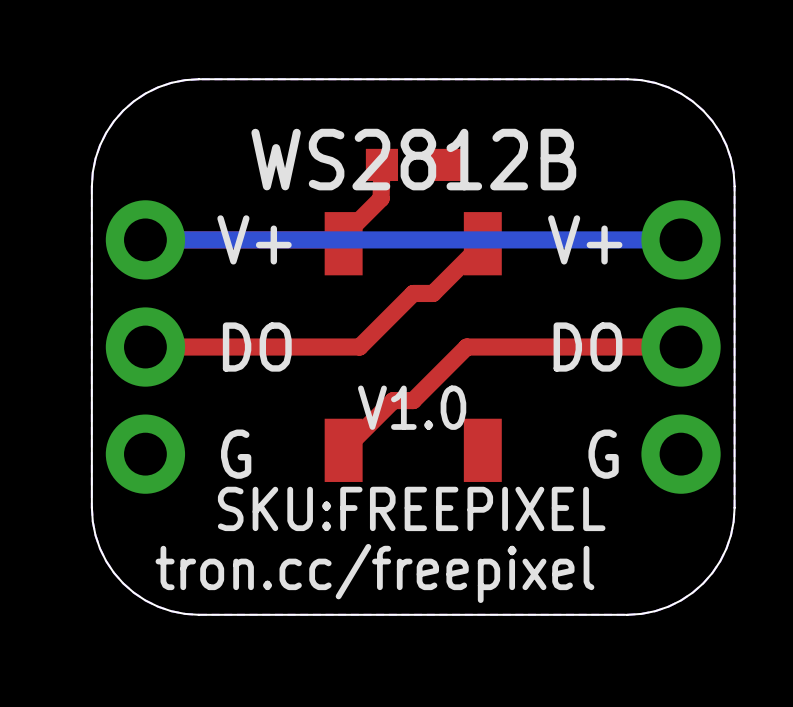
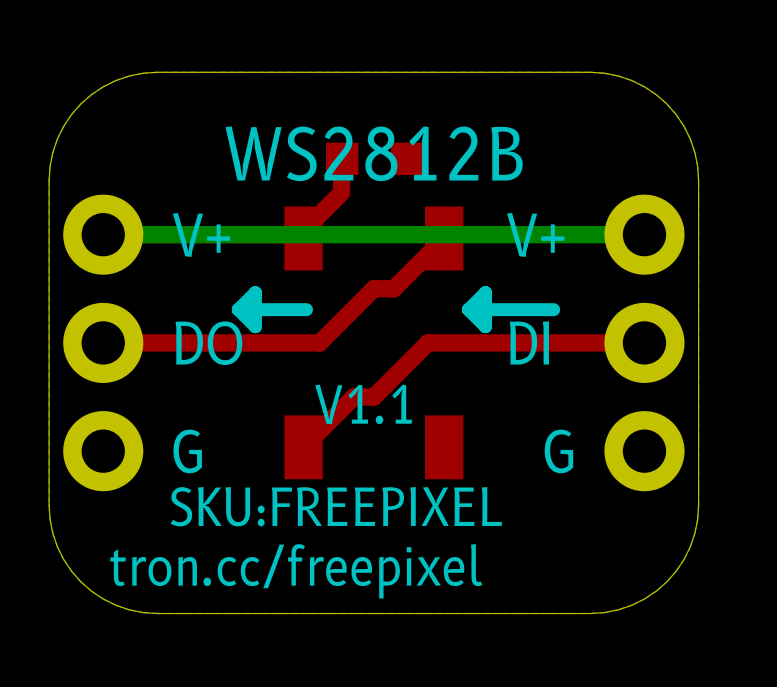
line: none -> (238, 309) (255, 326) (255, 292) (238, 309)
line: none -> (306, 309) (238, 309)
line: none -> (468, 309) (485, 326) (485, 292) (468, 309)
line: none -> (553, 309) (468, 309)
text: DO (588, 347) -> DI (529, 342)
text: V1.0 (412, 407) -> V1.1 (363, 404)

